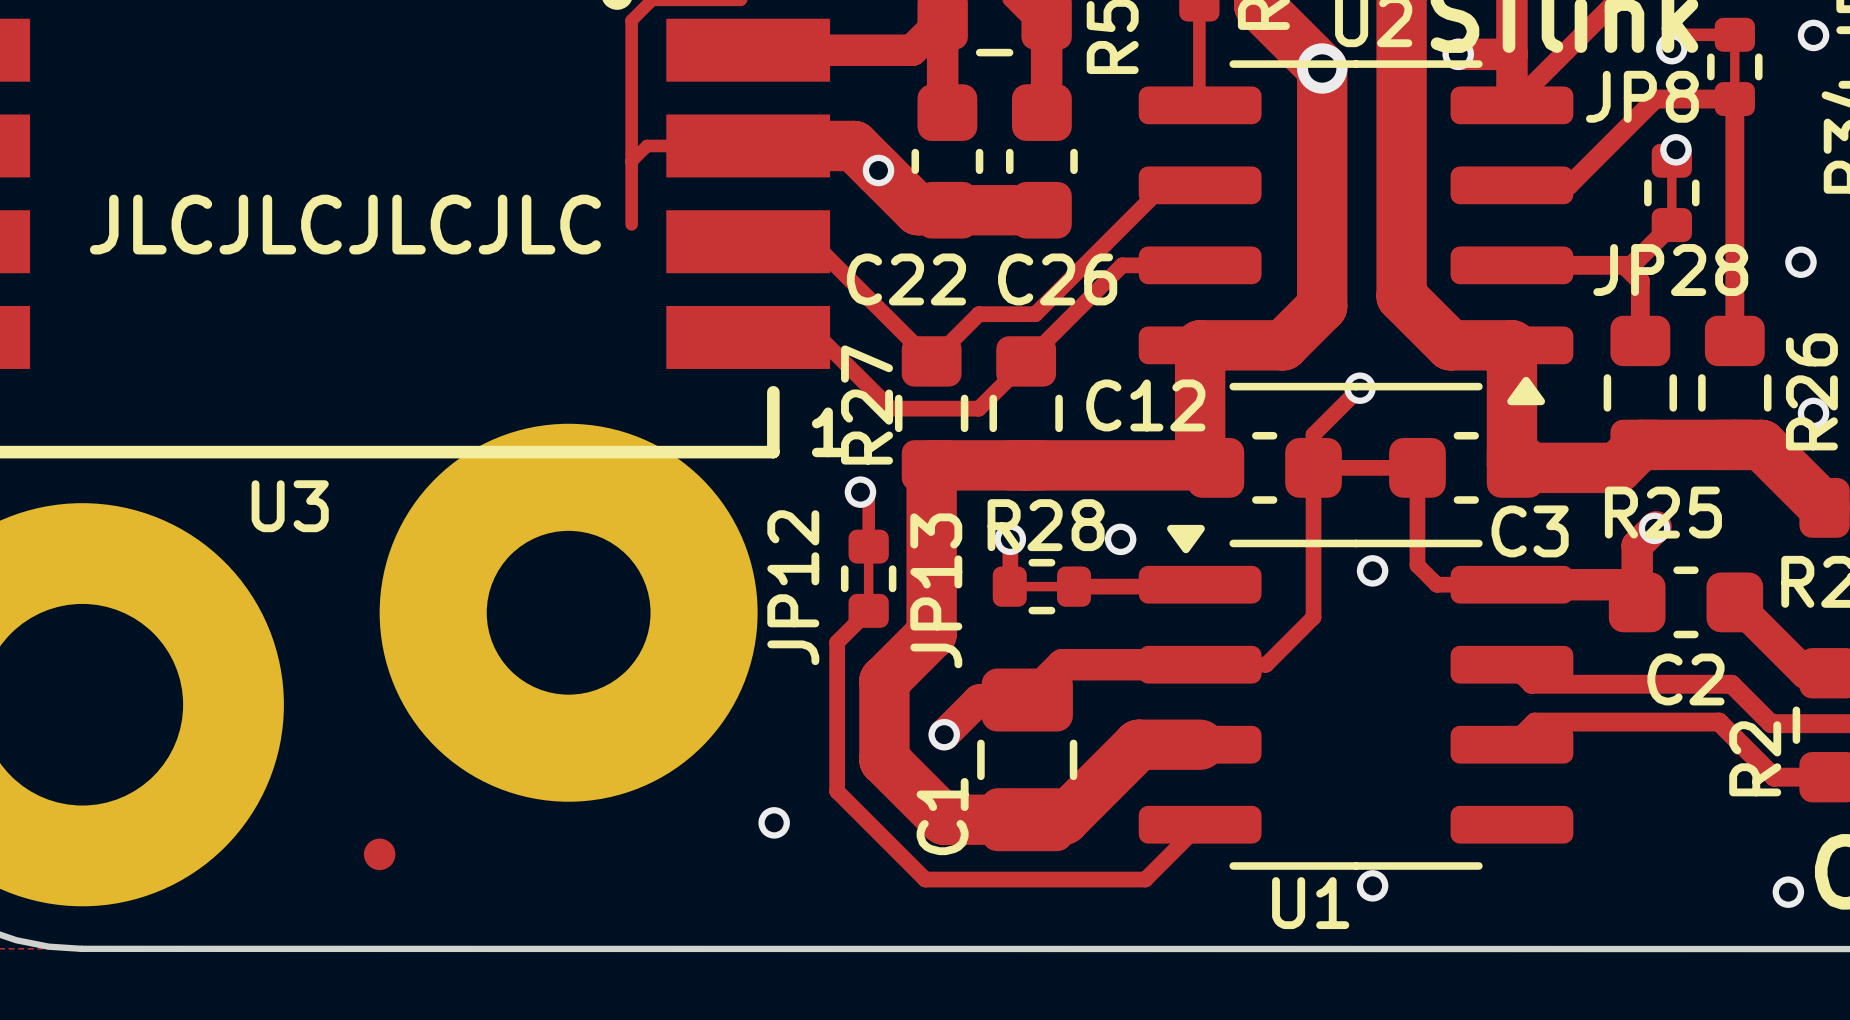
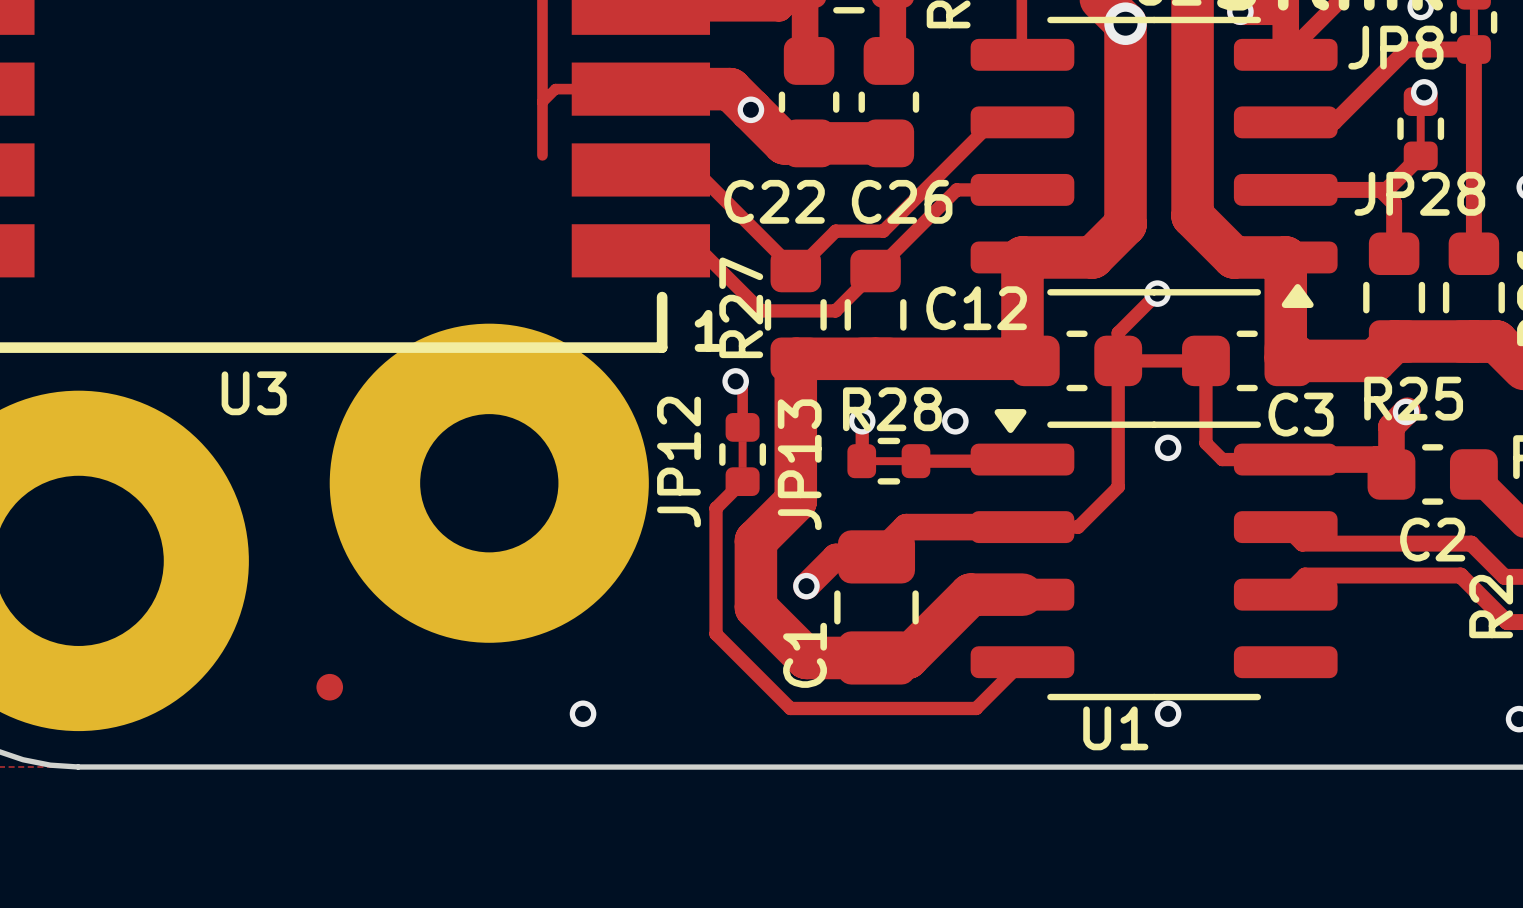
text: JLCJLCJLCJLC (345, 224) -> none
via position: (774, 822) -> (583, 713)

